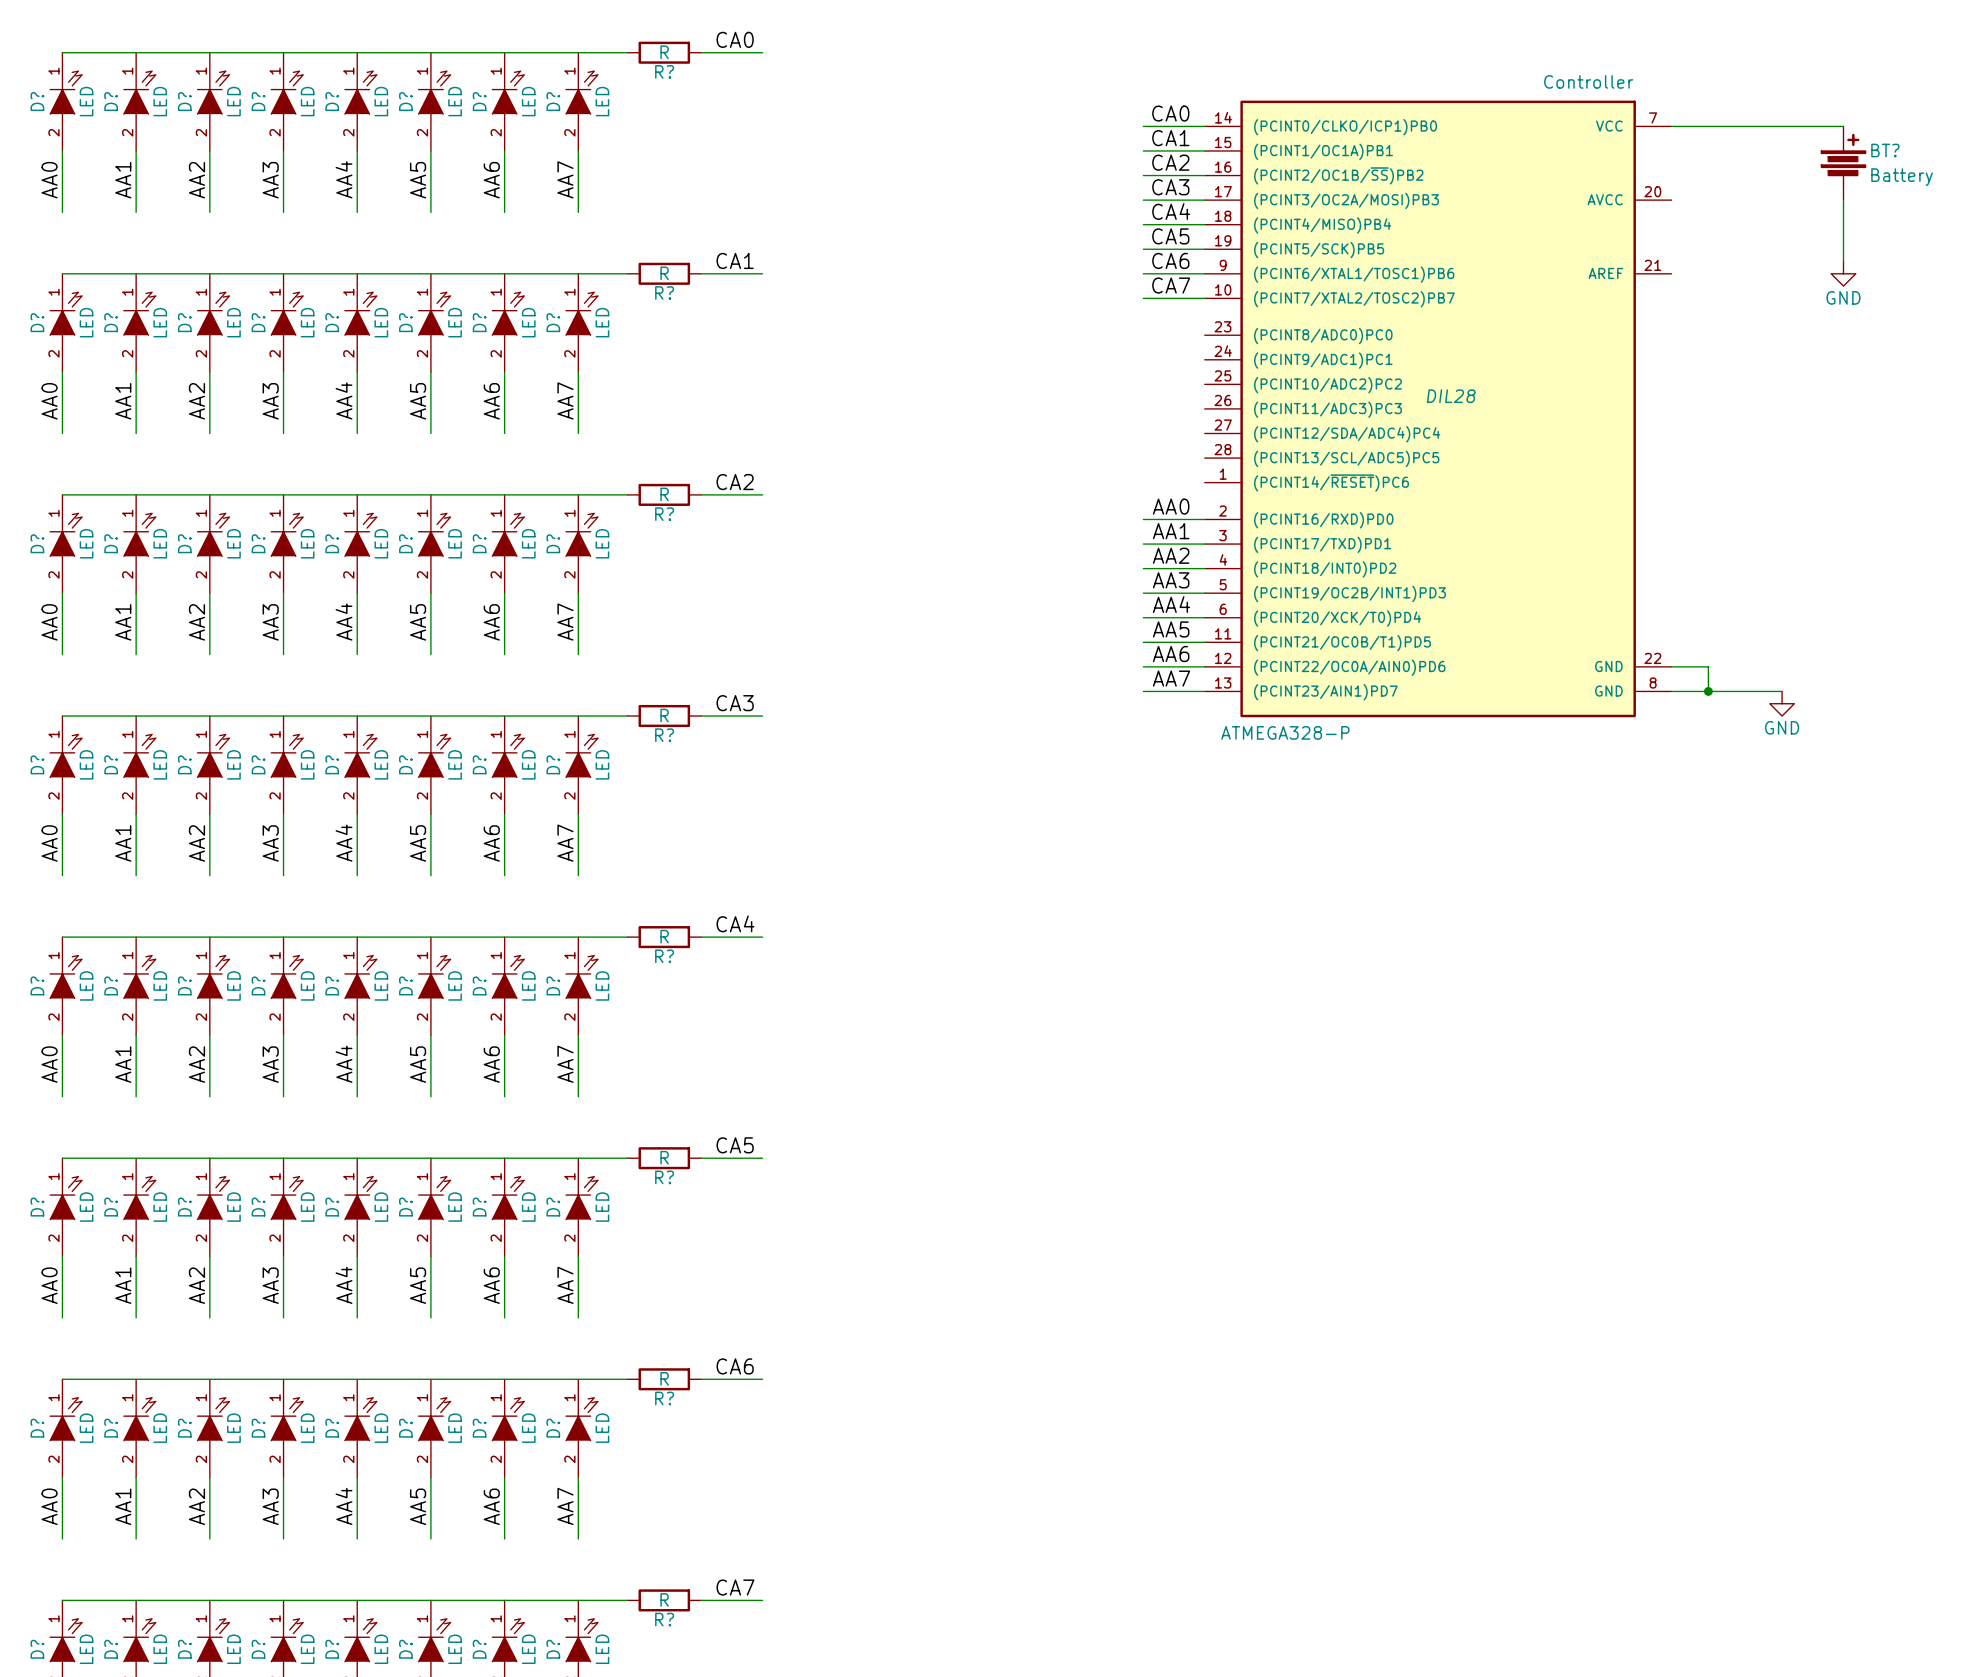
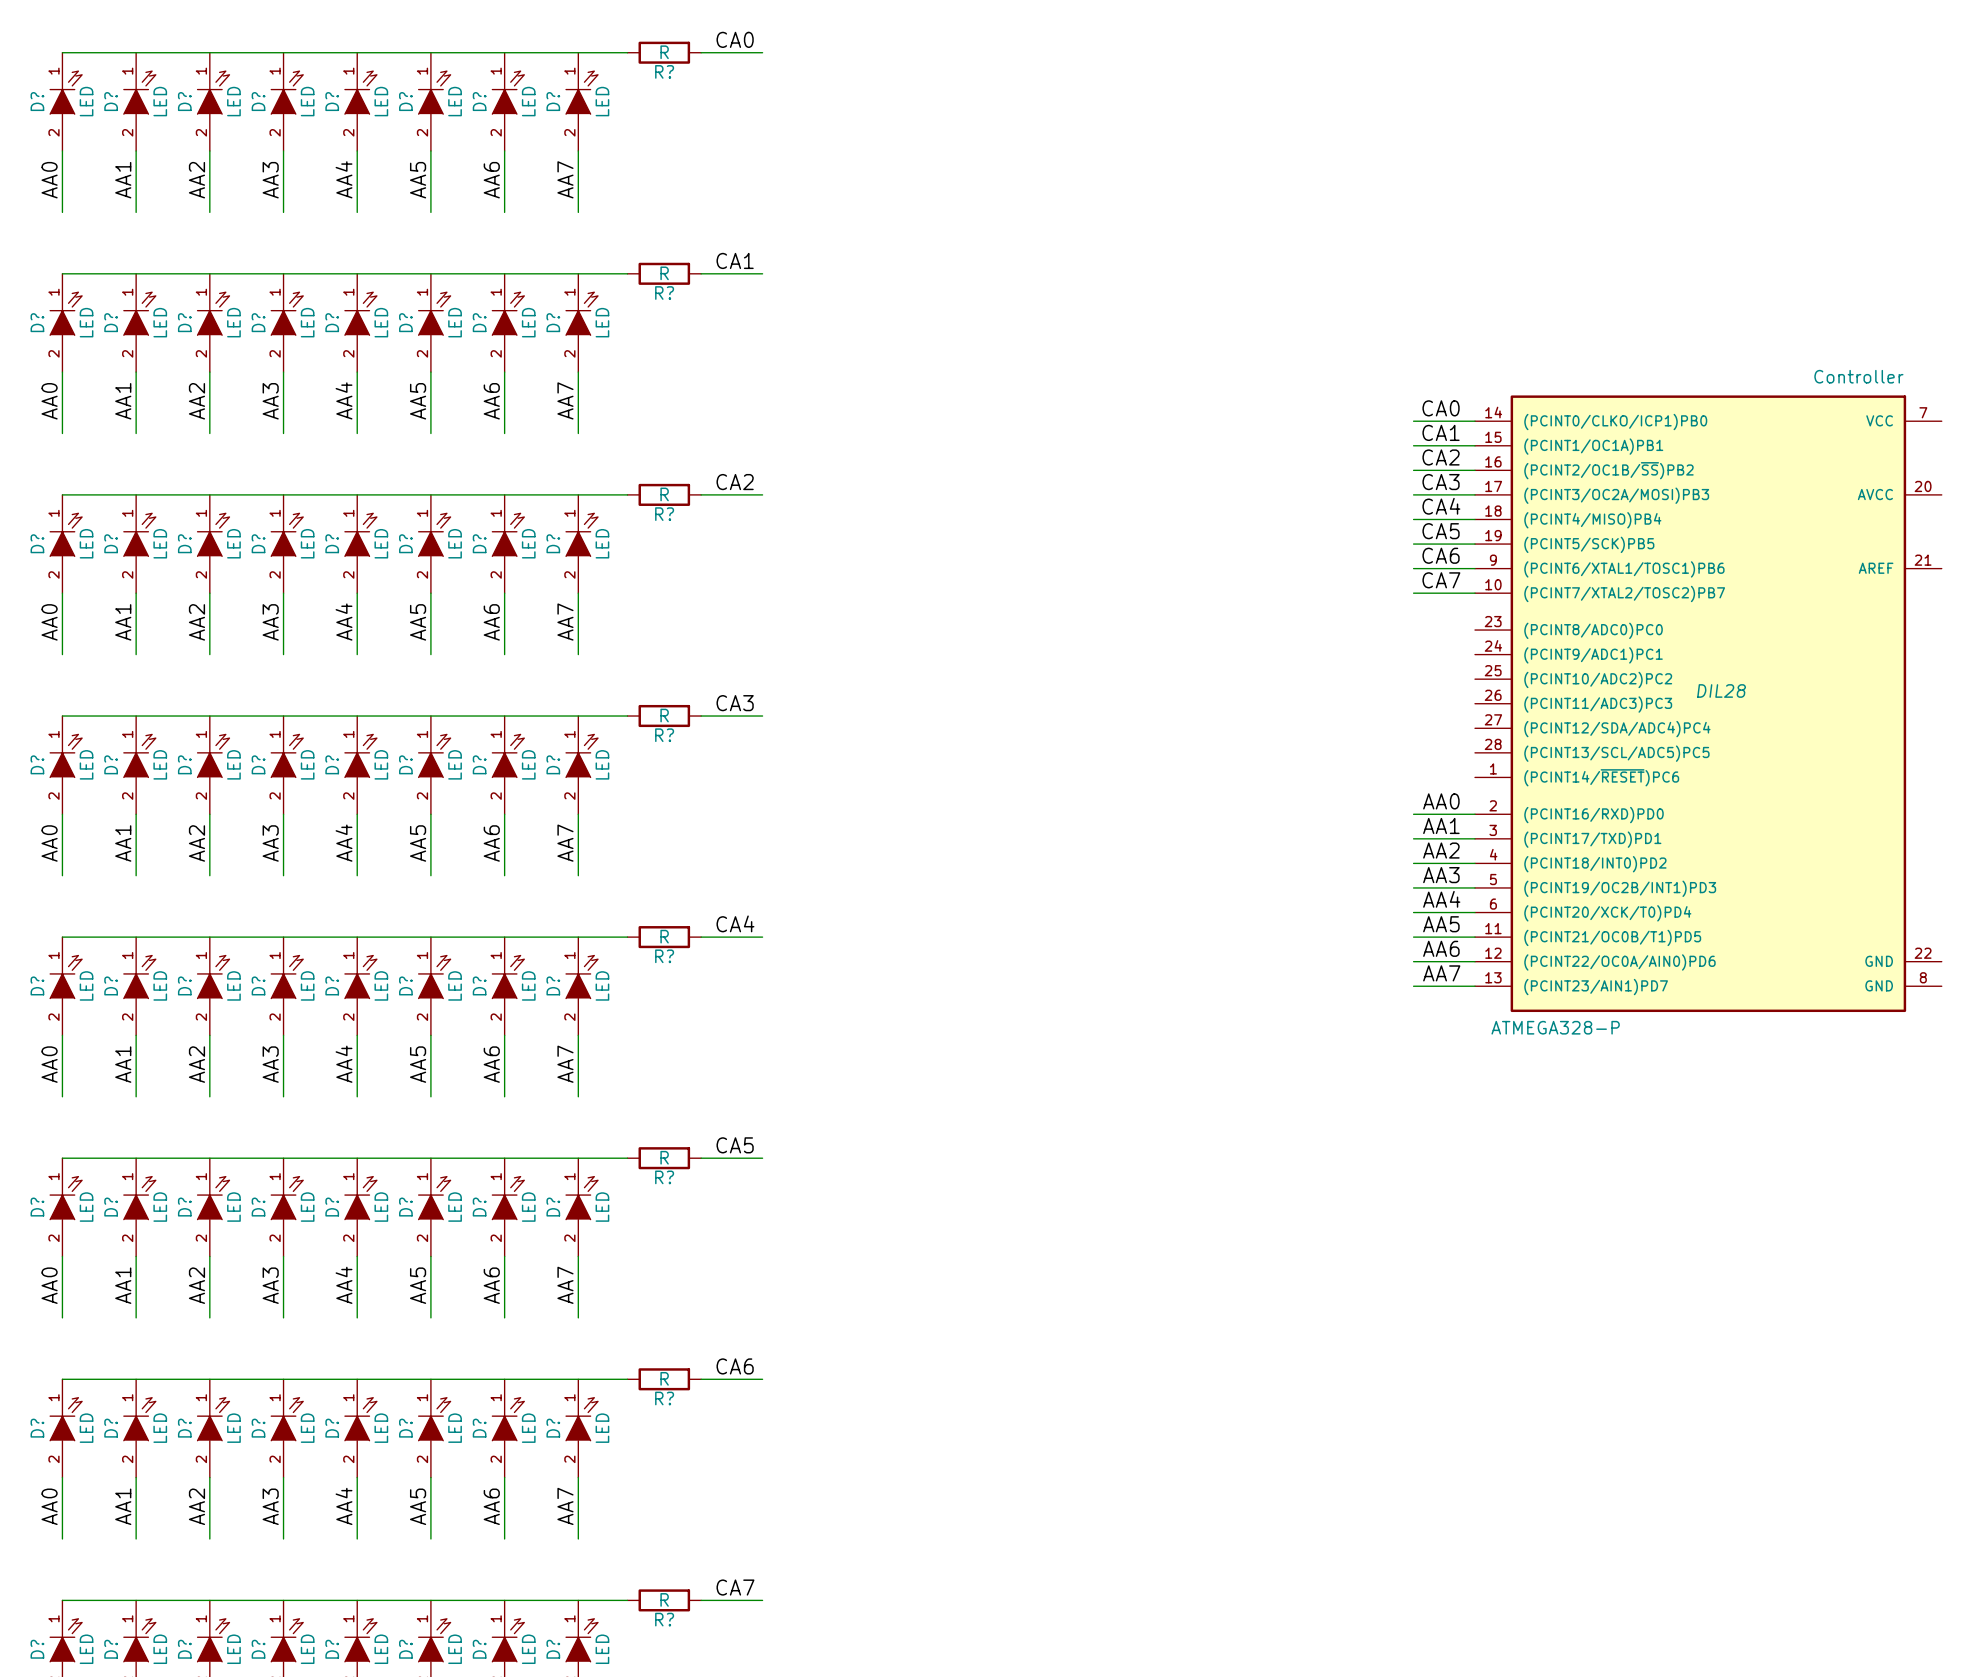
label: CA0 (1170, 113) -> none
wire: (1143, 126) (1204, 126) -> none
wire: (1671, 126) (1843, 126) -> none
label: CA1 (1170, 138) -> none
wire: (1143, 150) (1204, 150) -> none
label: CA2 (1170, 162) -> none
BT?: Battery (1843, 163) -> none
wire: (1143, 175) (1204, 175) -> none
label: CA3 (1170, 187) -> none
wire: (1143, 200) (1204, 200) -> none
wire: (1843, 200) (1843, 261) -> none
label: CA4 (1171, 211) -> none
wire: (1143, 224) (1204, 224) -> none
label: CA5 (1170, 236) -> none
wire: (1143, 249) (1204, 249) -> none
label: CA6 (1170, 260) -> none
wire: (1143, 273) (1204, 273) -> none
power symbol: GND (1843, 273) -> none
label: CA7 (1171, 285) -> none
wire: (1143, 298) (1204, 298) -> none
Controller: ATMEGA328-P (1438, 408) -> none
label: none -> CA0 (1441, 408)
label: none -> CA1 (1441, 432)
label: none -> CA2 (1441, 457)
label: none -> CA3 (1441, 482)
label: AA0 (1171, 506) -> none
label: none -> CA4 (1441, 506)
wire: (1143, 519) (1204, 519) -> none
label: AA1 (1171, 531) -> none
label: none -> CA5 (1441, 531)
wire: (1143, 544) (1204, 544) -> none
label: AA2 (1171, 555) -> none
label: none -> CA6 (1441, 555)
wire: (1143, 568) (1204, 568) -> none
label: AA3 (1171, 580) -> none
label: none -> CA7 (1441, 580)
wire: (1143, 593) (1204, 593) -> none
label: AA4 (1171, 604) -> none
wire: (1143, 617) (1204, 617) -> none
label: AA5 (1171, 629) -> none
wire: (1143, 642) (1204, 642) -> none
label: AA6 (1171, 654) -> none
wire: (1143, 666) (1204, 666) -> none
label: AA7 (1171, 678) -> none
wire: (1143, 691) (1204, 691) -> none
junction: (1708, 691) -> none
Controller: none -> ATMEGA328-P (1708, 703)
power symbol: GND (1782, 703) -> none
label: none -> AA0 (1441, 801)
wire: none -> (1413, 814) (1475, 814)
label: none -> AA1 (1441, 825)
wire: none -> (1413, 838) (1475, 838)
label: none -> AA2 (1441, 850)
wire: none -> (1413, 863) (1475, 863)
label: none -> AA3 (1441, 875)
wire: none -> (1413, 887) (1475, 887)
label: none -> AA4 (1441, 899)
wire: none -> (1413, 912) (1475, 912)
label: none -> AA5 (1441, 924)
wire: none -> (1413, 937) (1475, 937)
label: none -> AA6 (1441, 948)
wire: none -> (1413, 961) (1475, 961)
label: none -> AA7 (1441, 973)
wire: none -> (1413, 986) (1475, 986)

